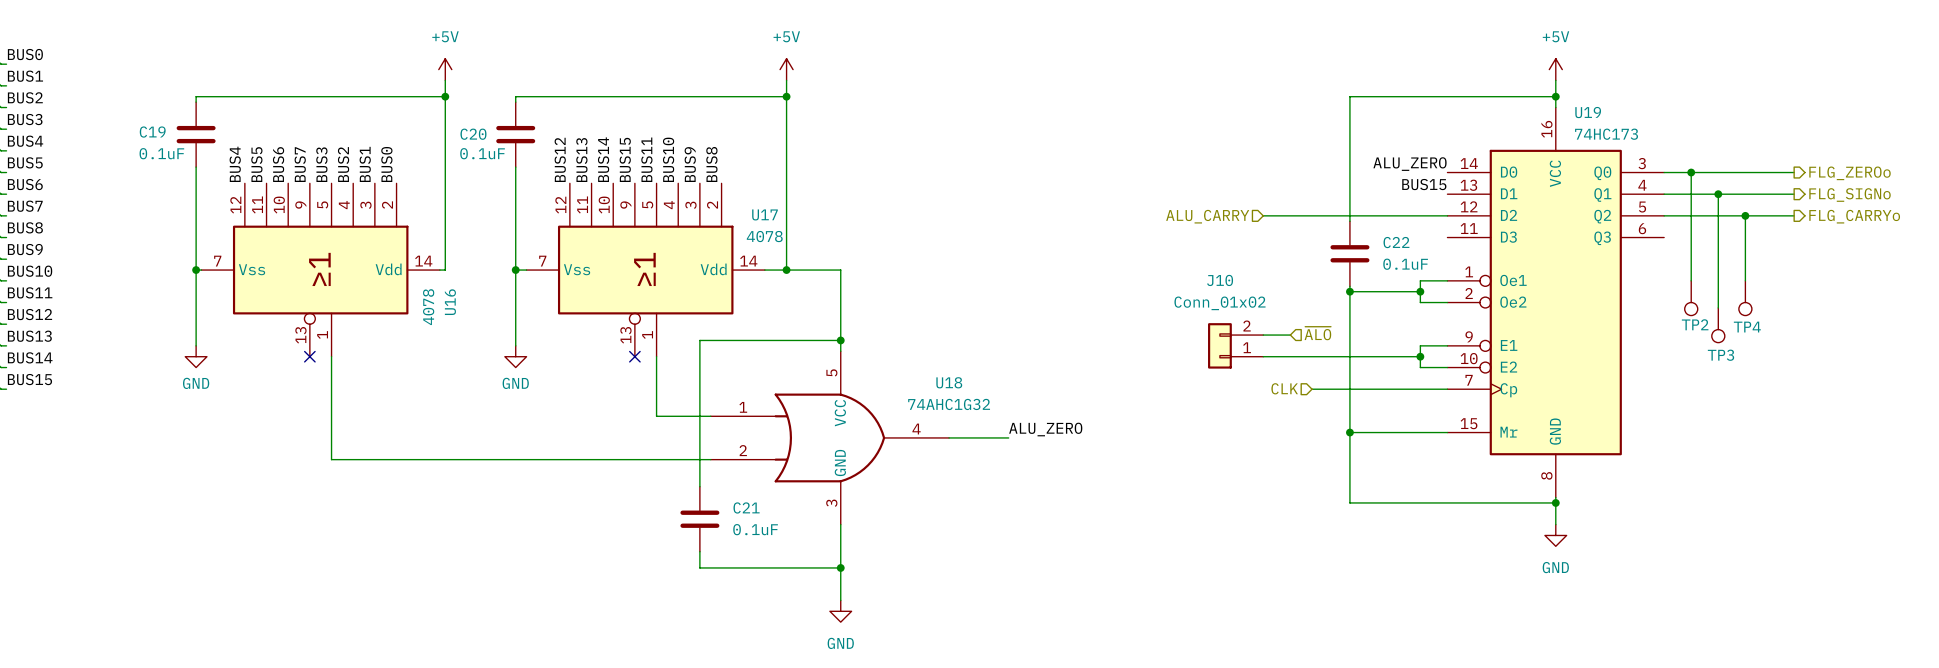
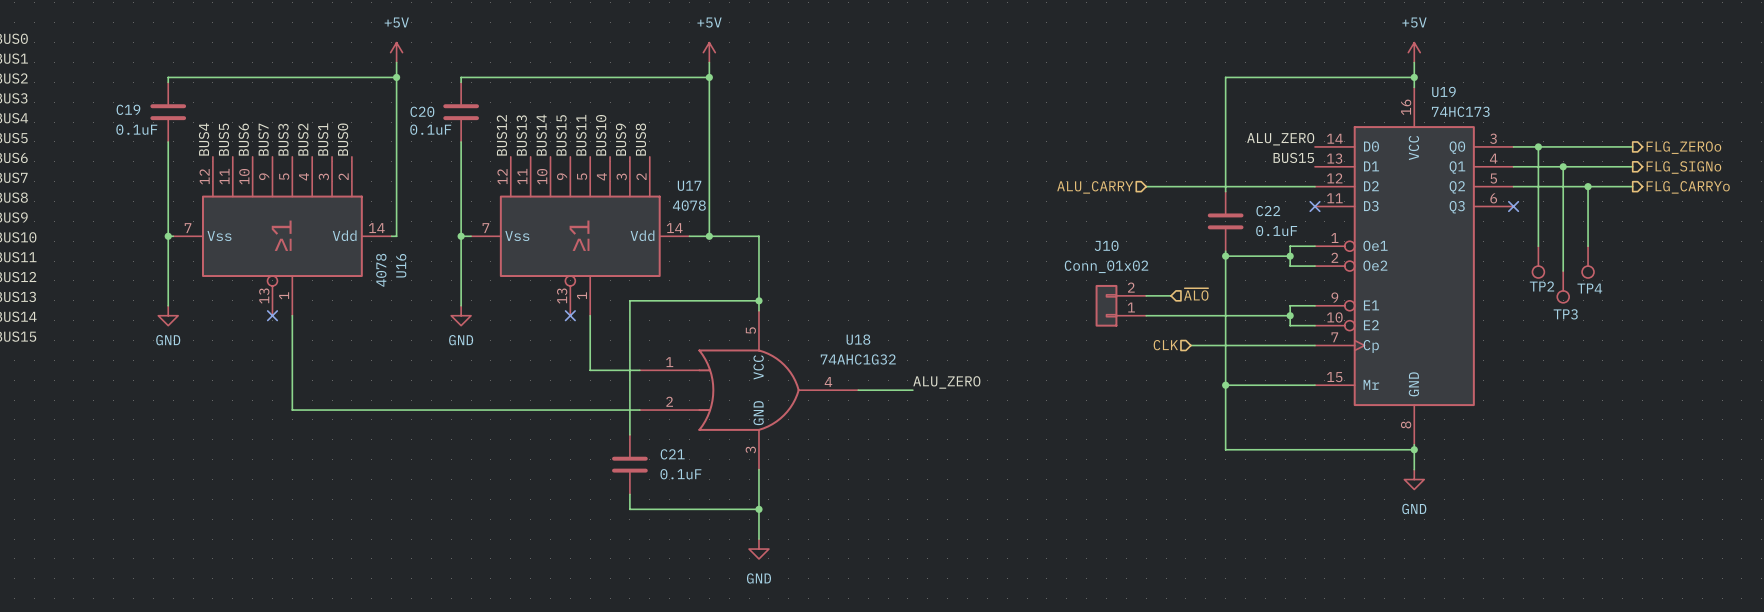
no-connect mark: none -> (1314, 206)
no-connect mark: none -> (1513, 206)

